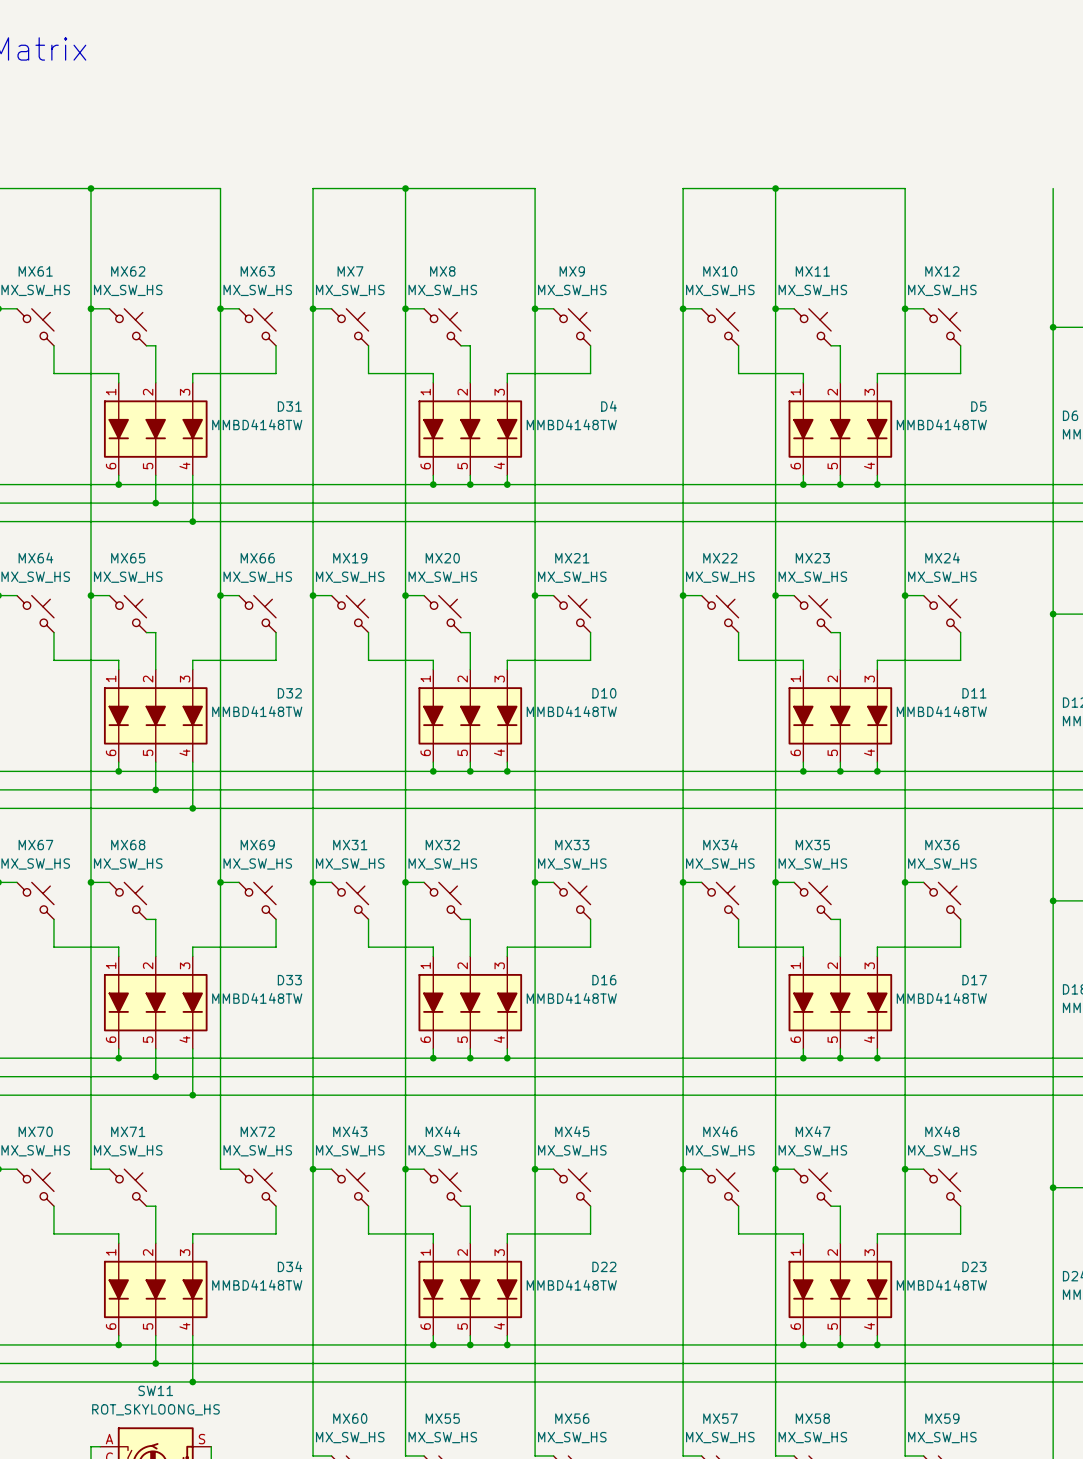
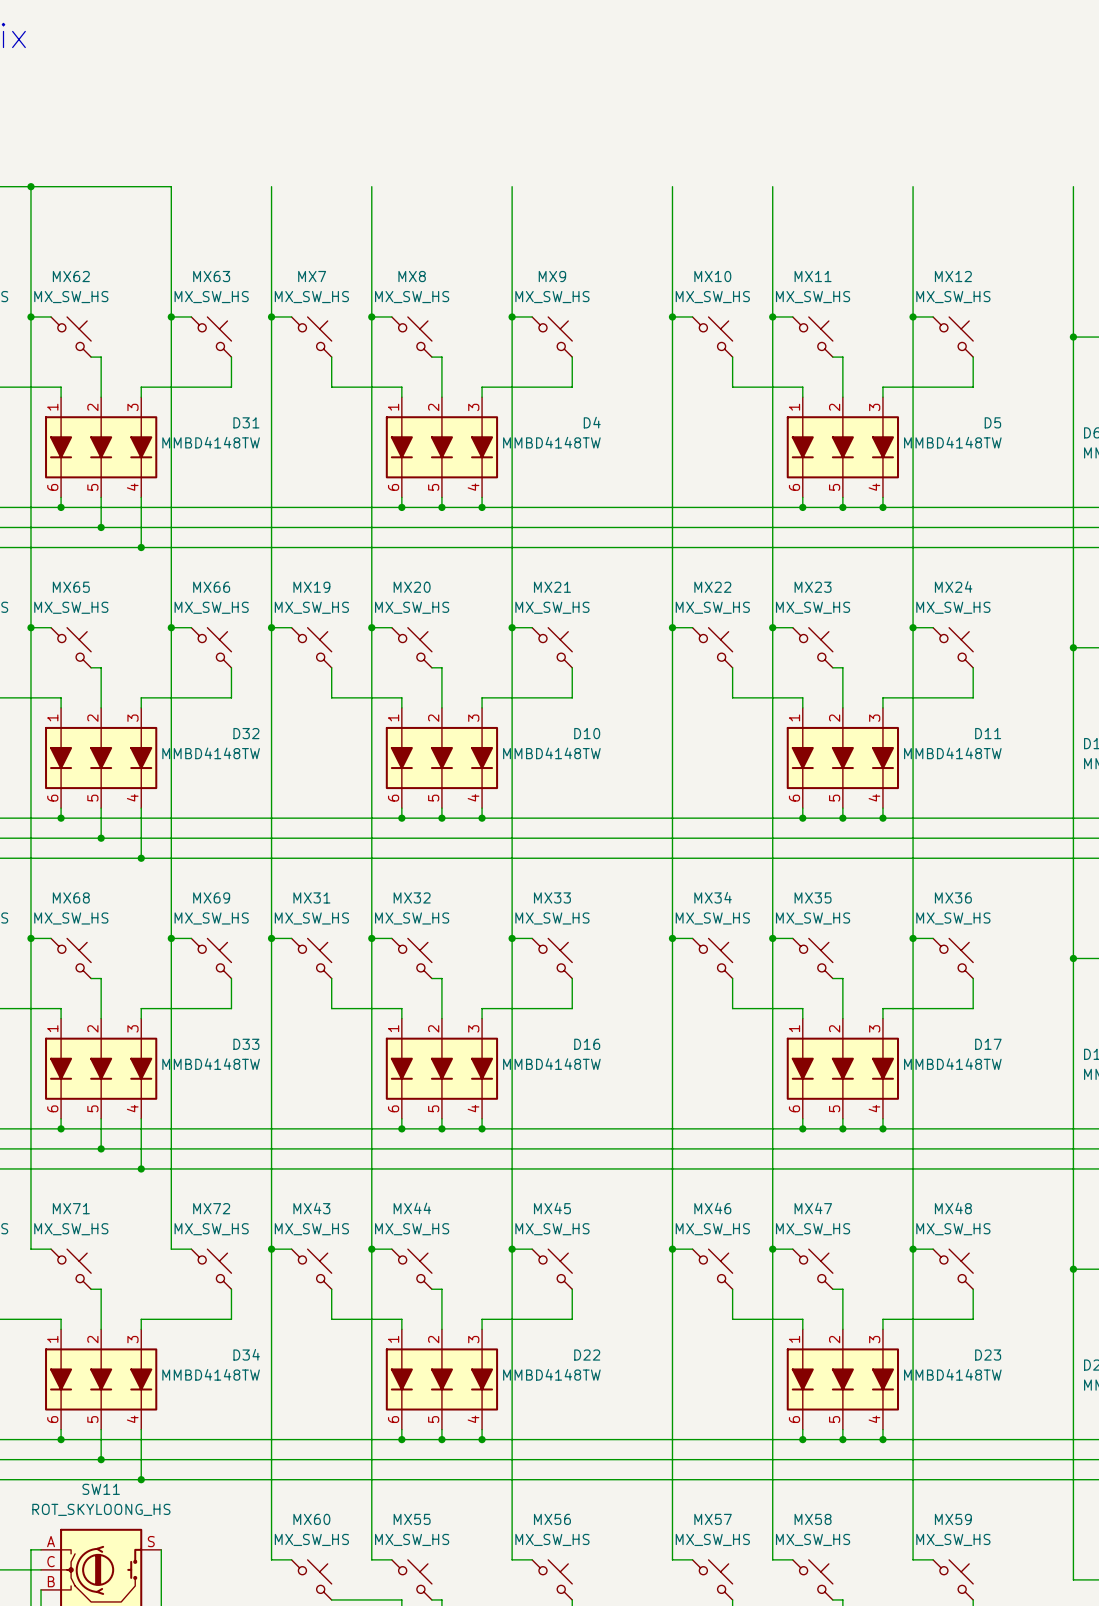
wire: (313, 188) (535, 188) -> none
junction: (405, 188) -> none
wire: (683, 188) (905, 188) -> none
junction: (775, 188) -> none

